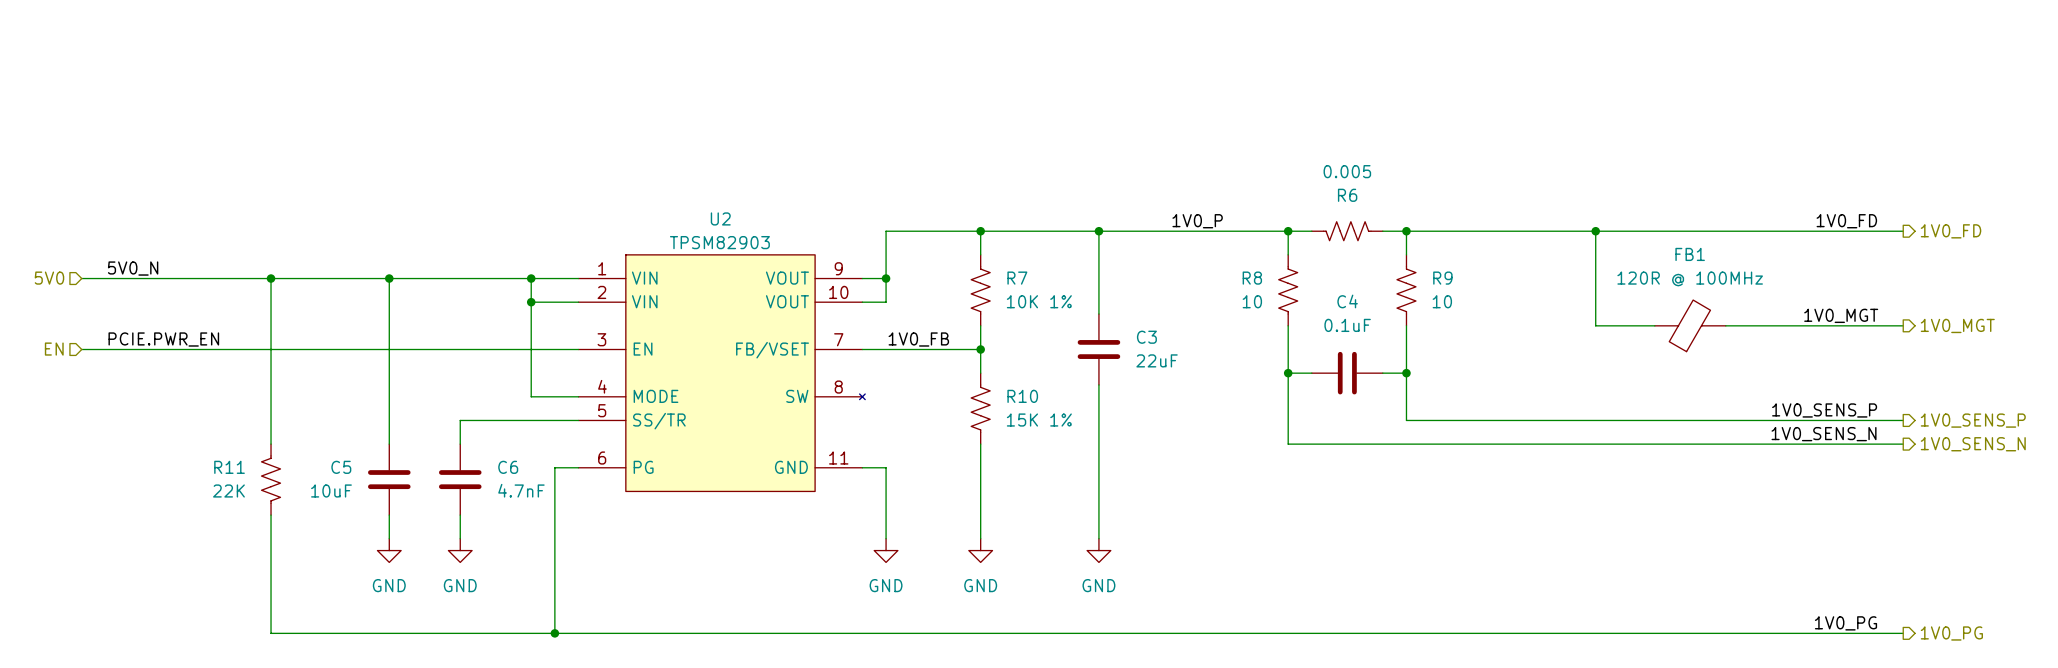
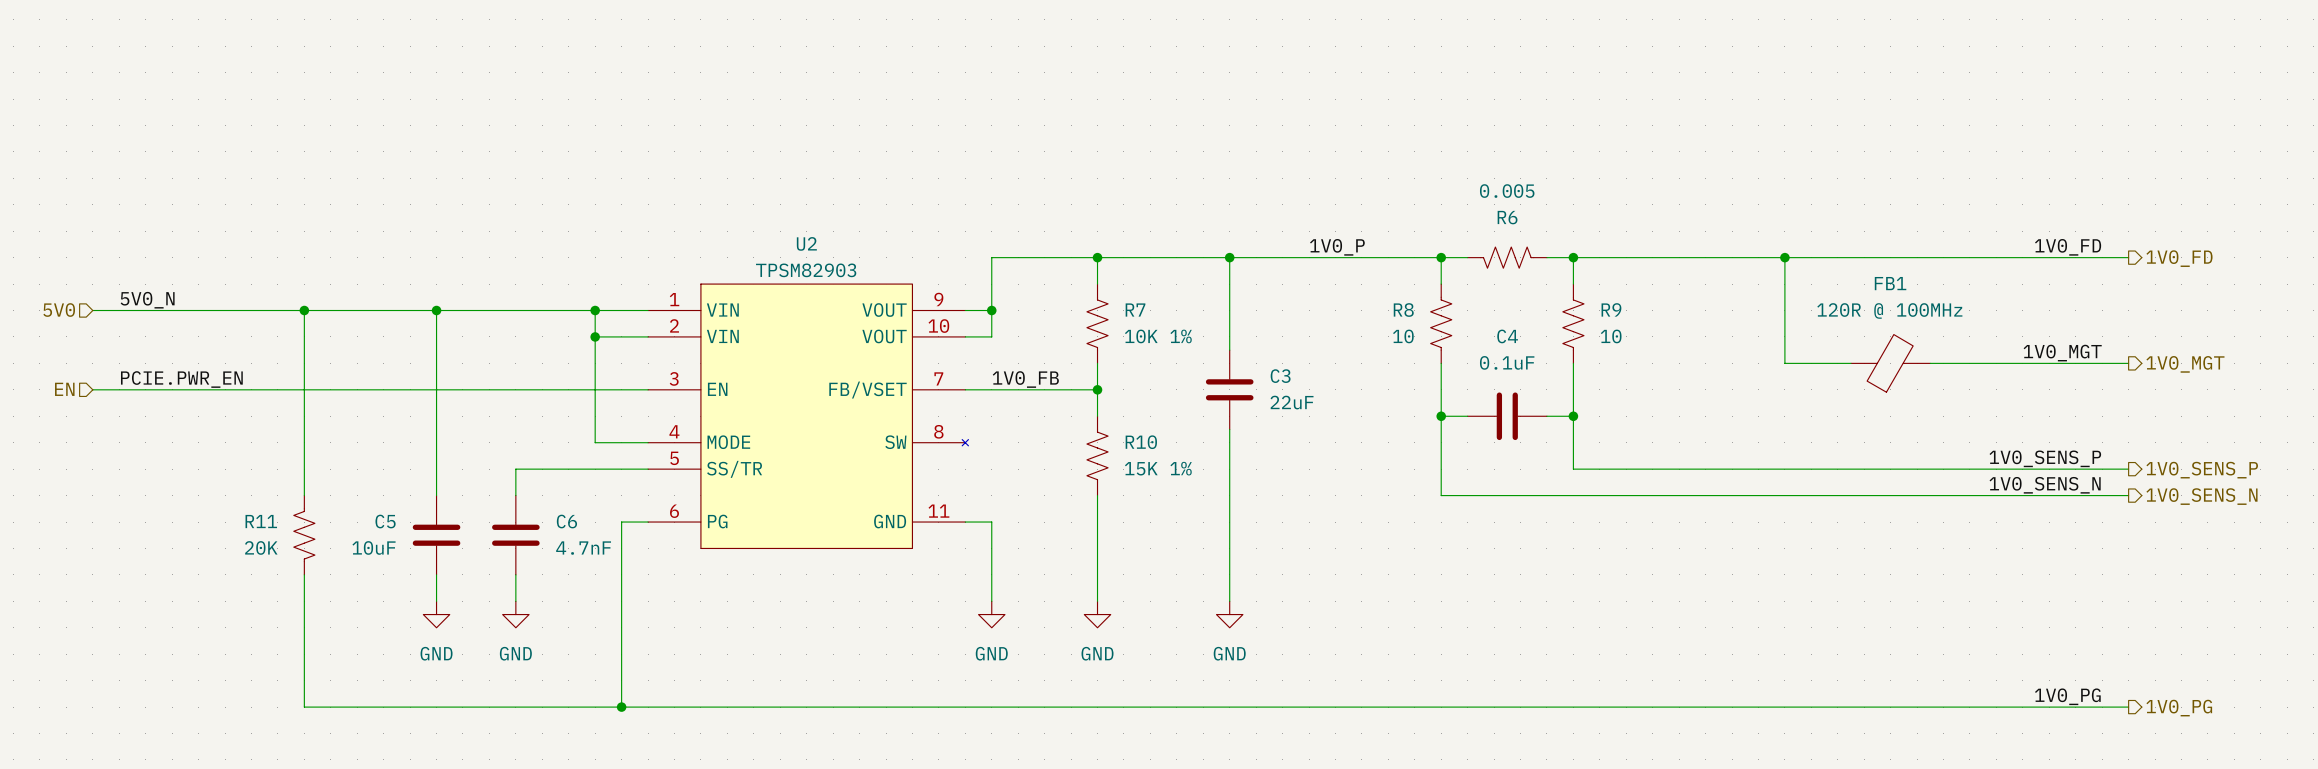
R11 value: 22K (228, 490) -> 20K (261, 547)

